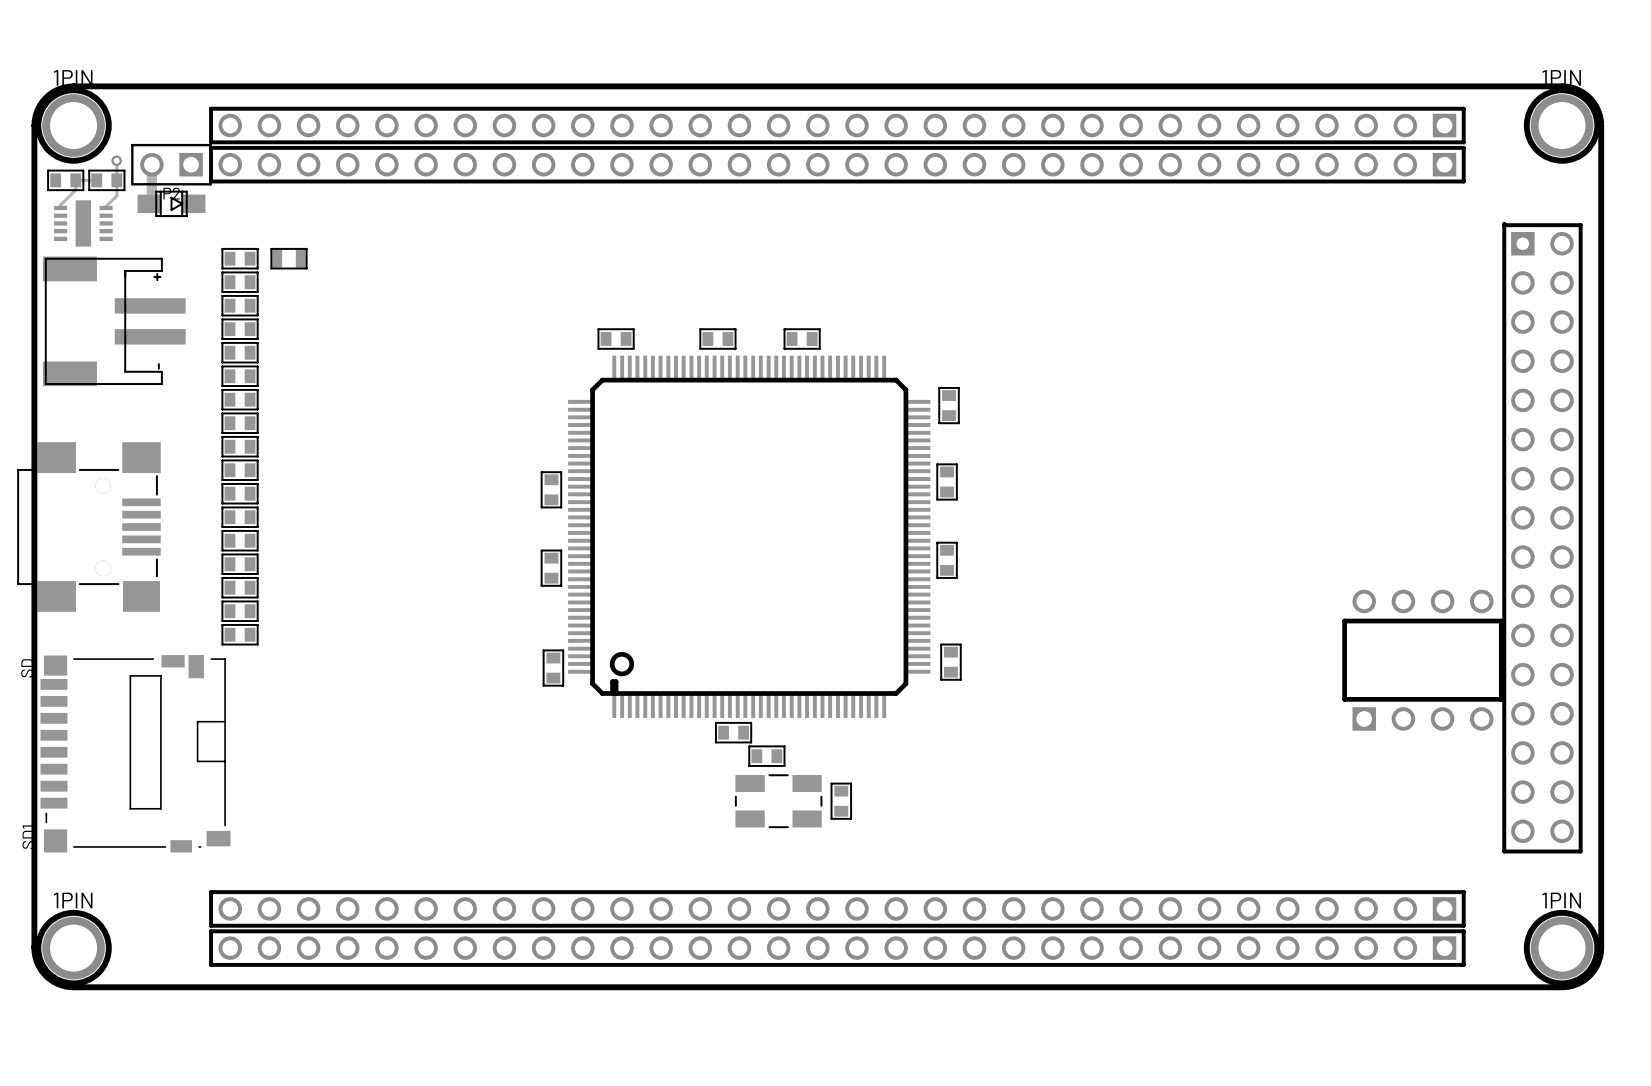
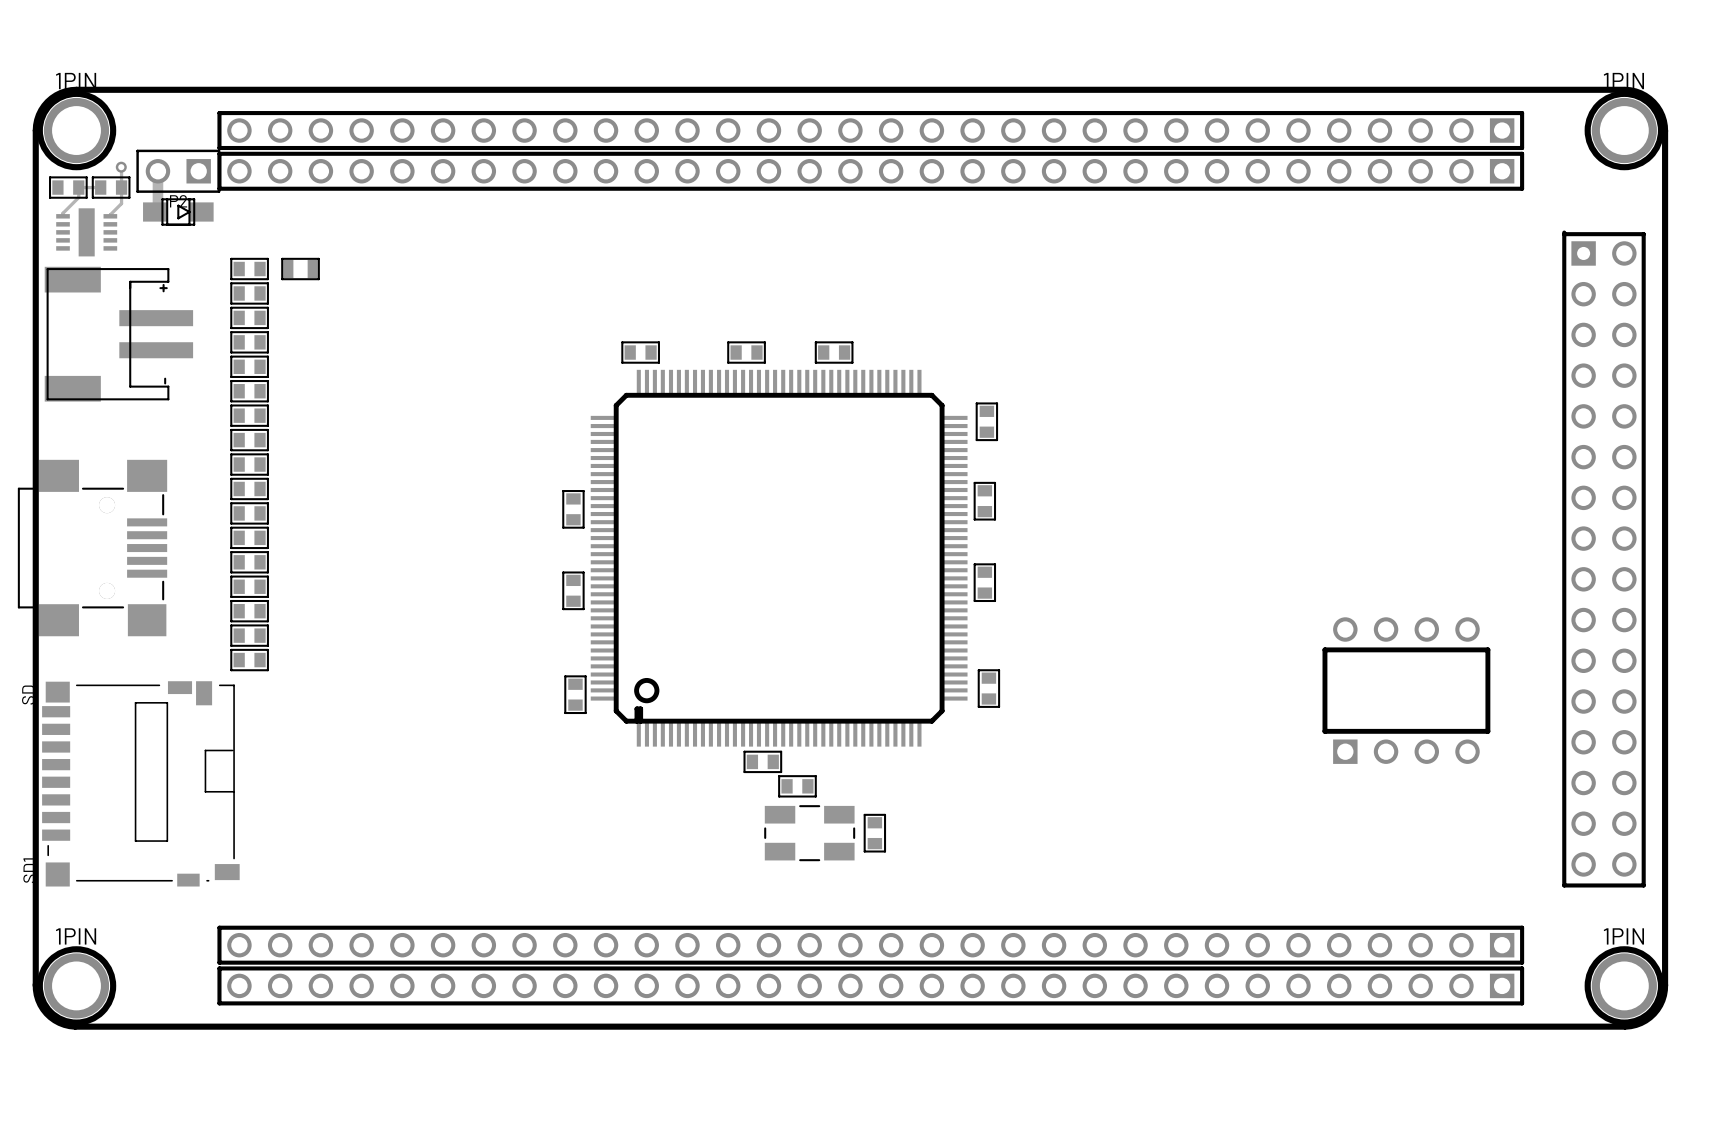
part position: (1422, 660) -> (1406, 690)

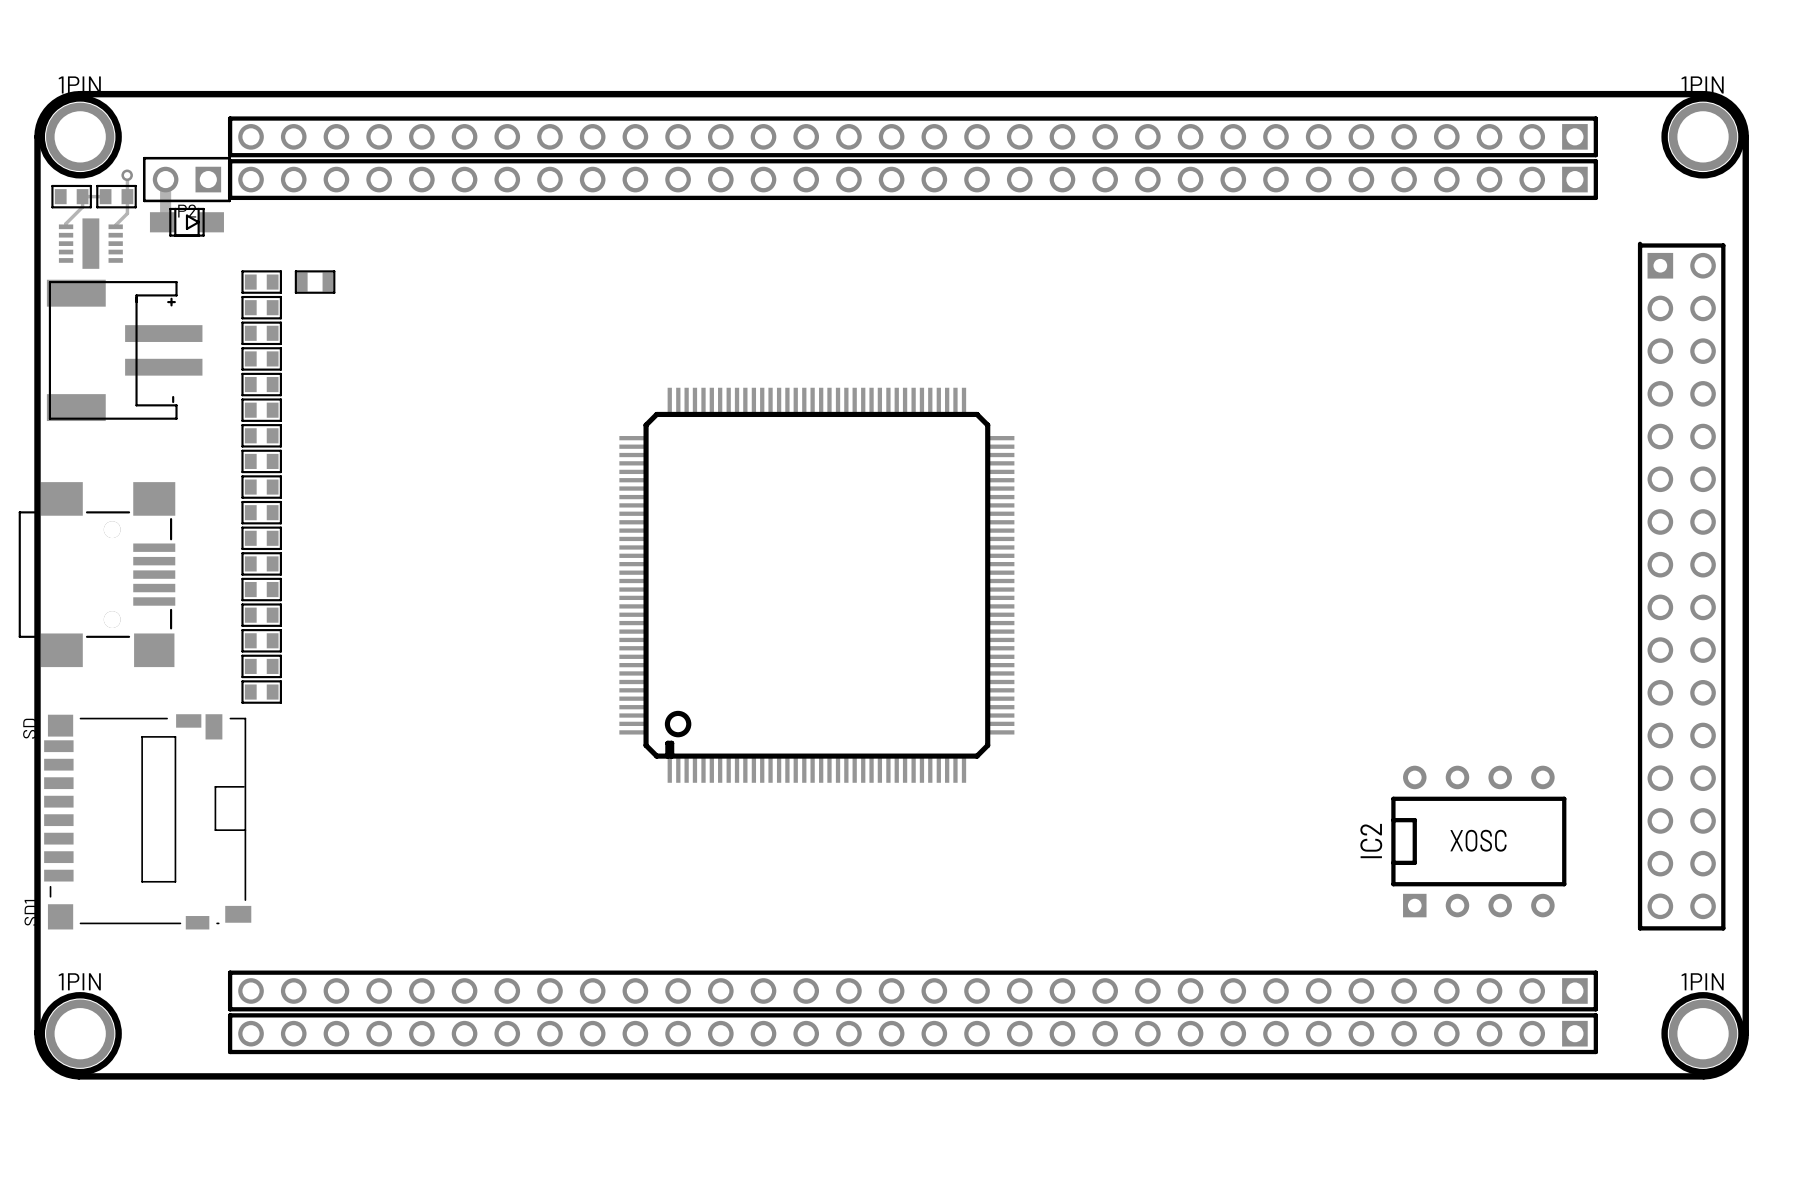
part: (640, 352) -> none
part: (746, 352) -> none
part: (834, 352) -> none
part: (986, 421) -> none
part: (984, 501) -> none
part: (573, 509) -> none
part: (984, 582) -> none
part: (573, 590) -> none
part: (988, 688) -> none
part: (1406, 690) -> none
part: (575, 694) -> none
part: (762, 761) -> none
part: (797, 786) -> none
IC2: none -> XOSC (1478, 841)
part: (809, 833) -> none
part: (874, 833) -> none

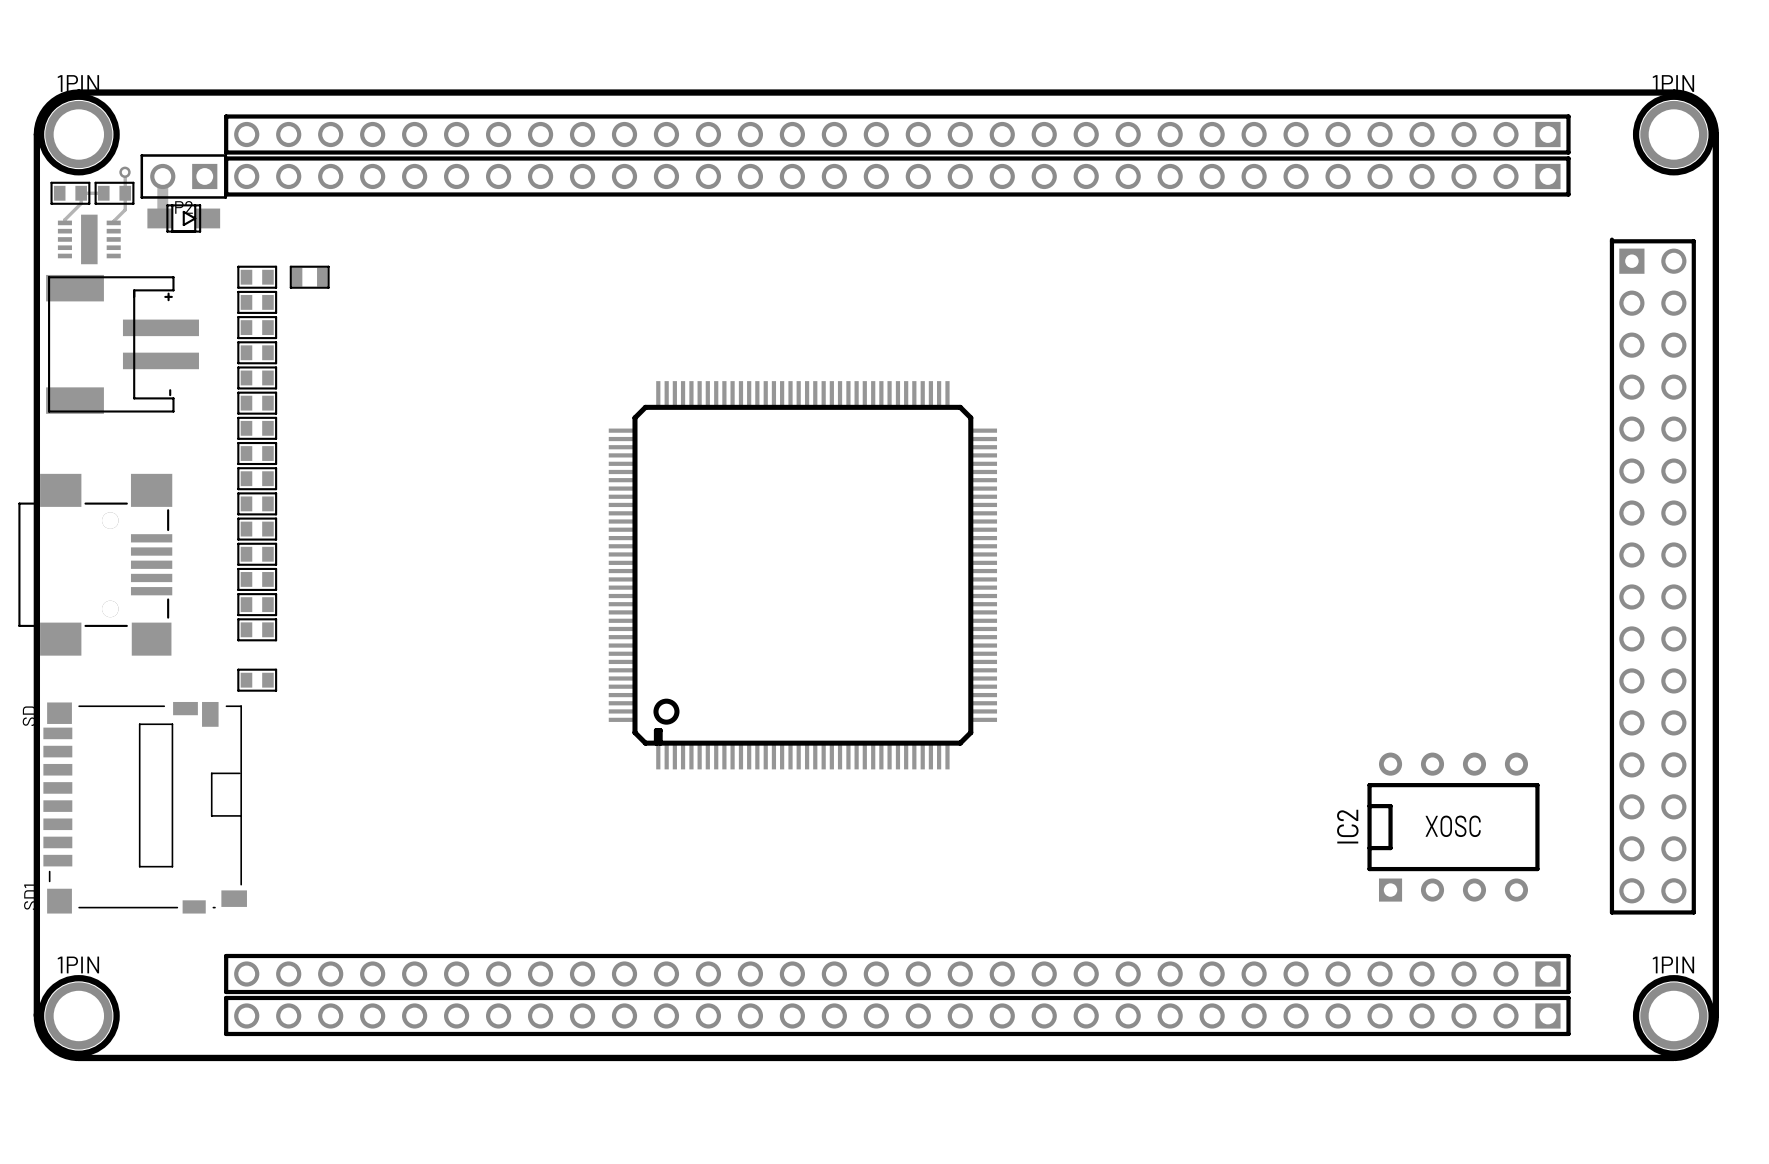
part: (261, 666) -> none

